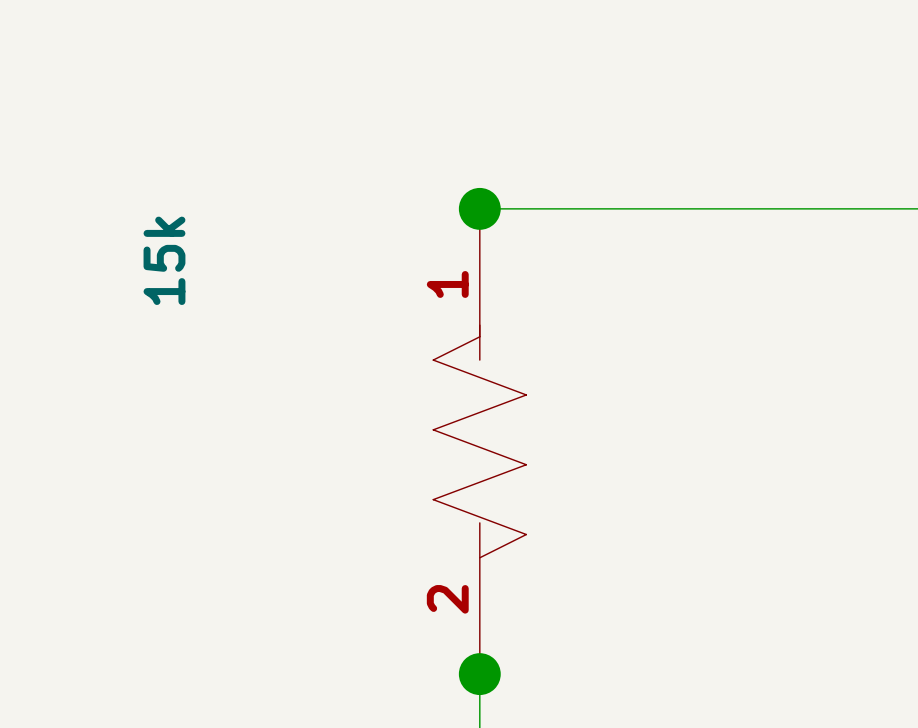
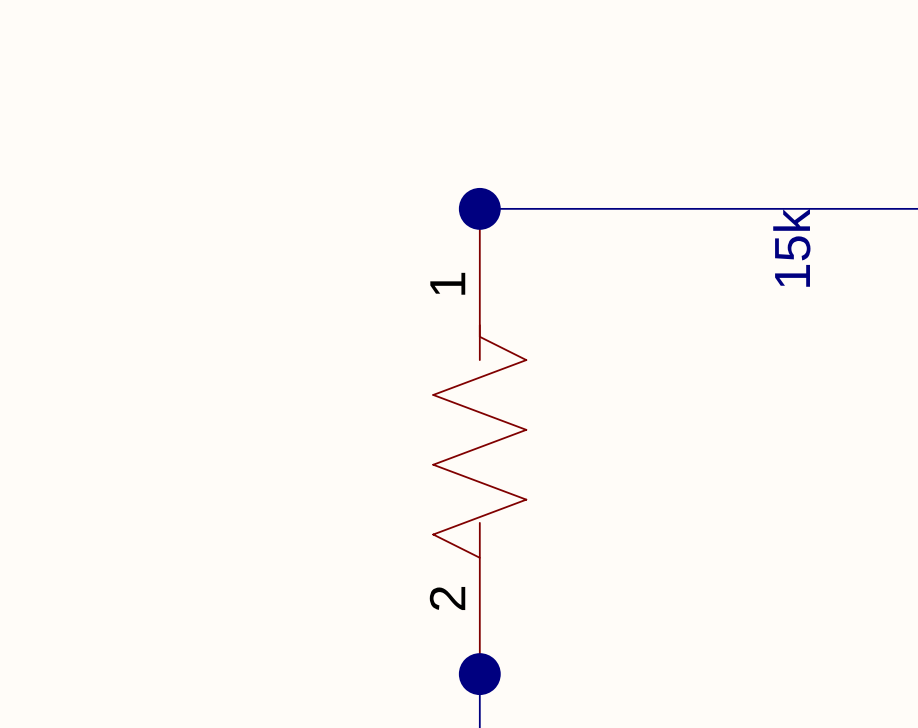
part flip: as is (479, 441) -> left-right (479, 441)

